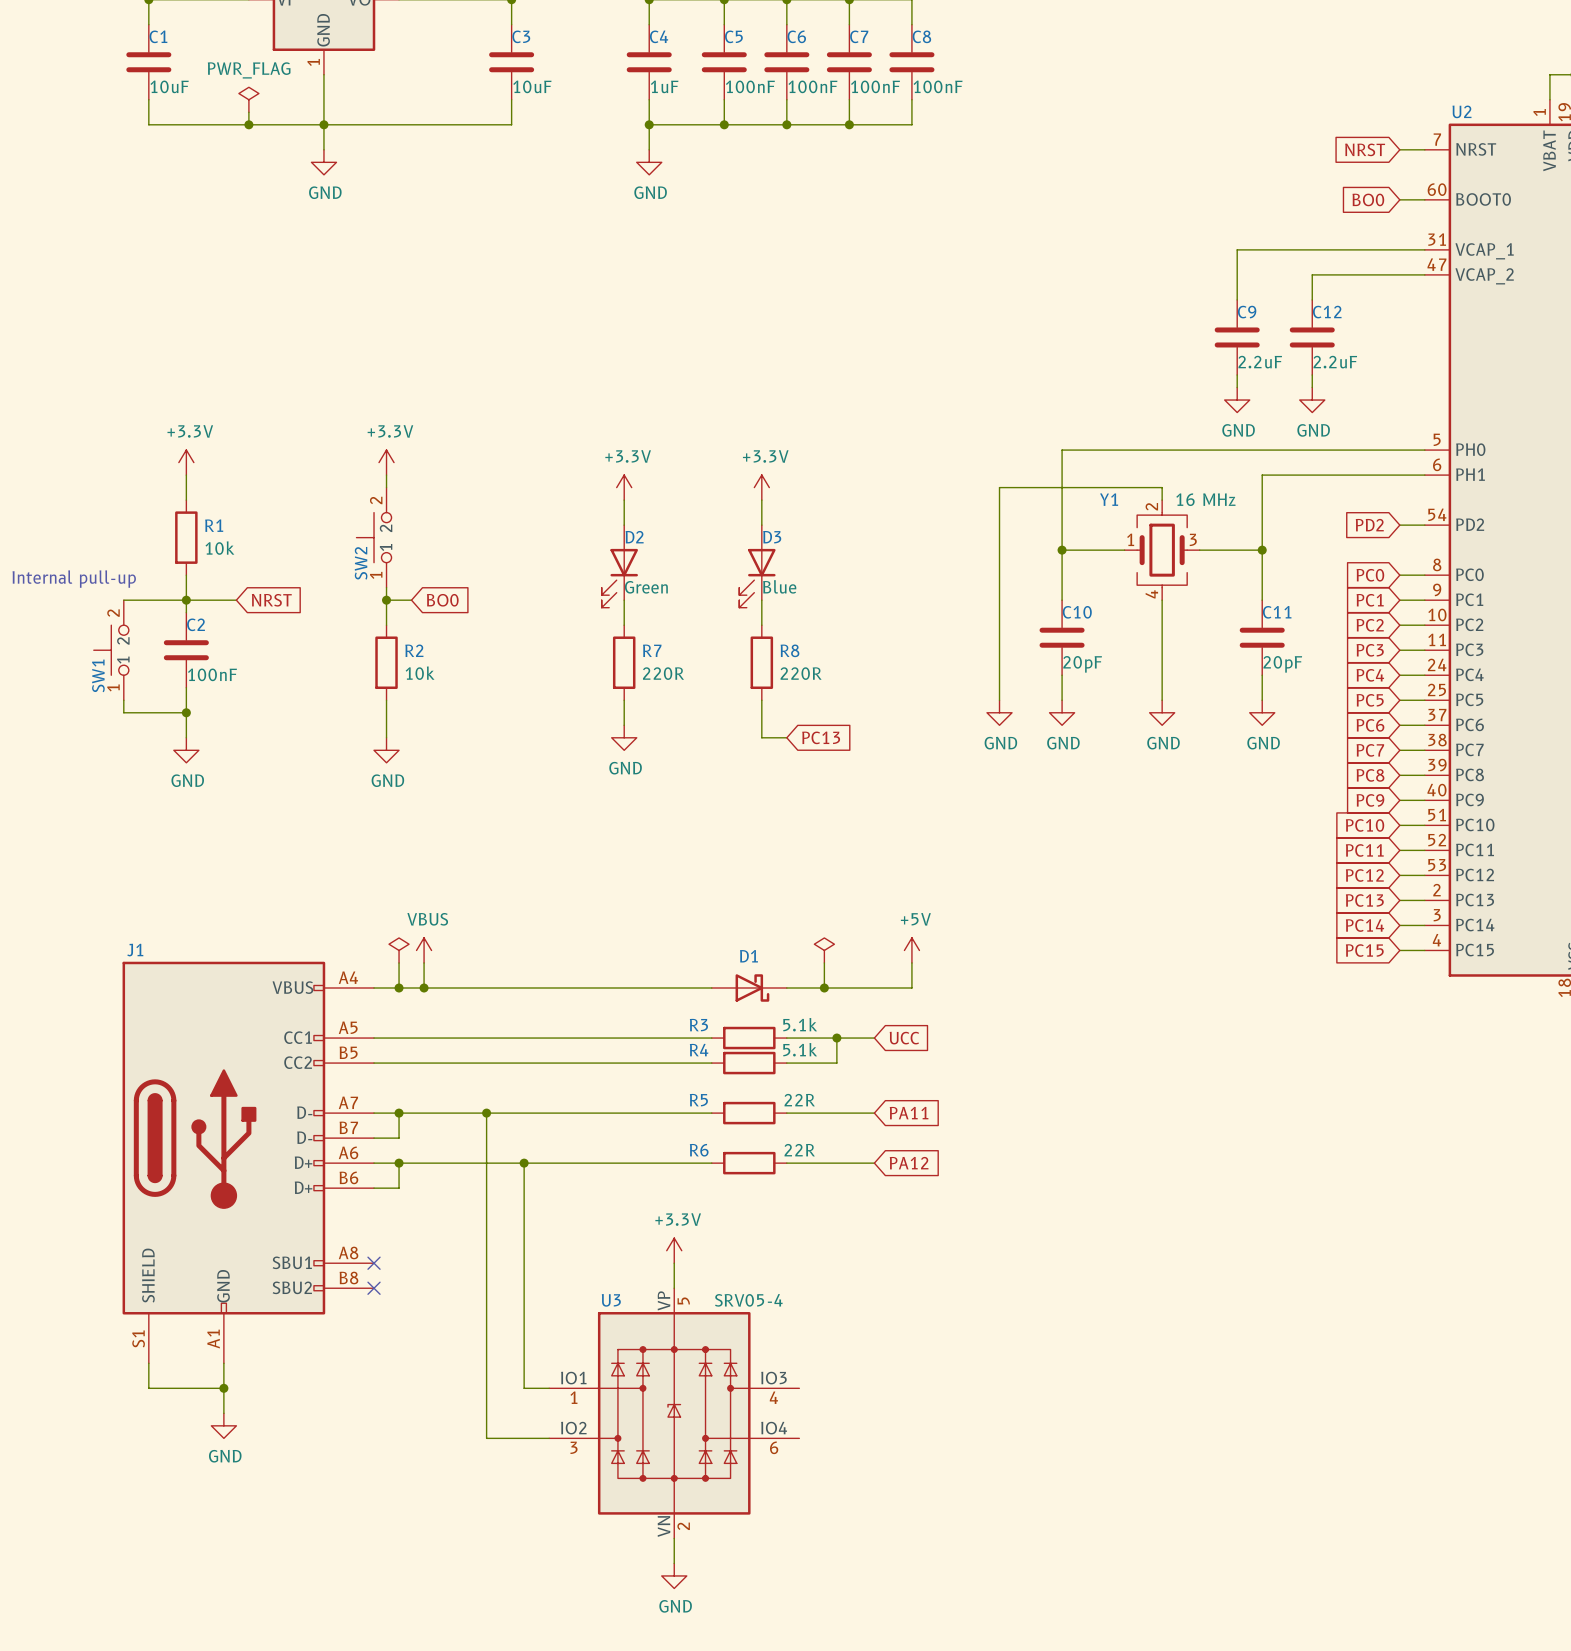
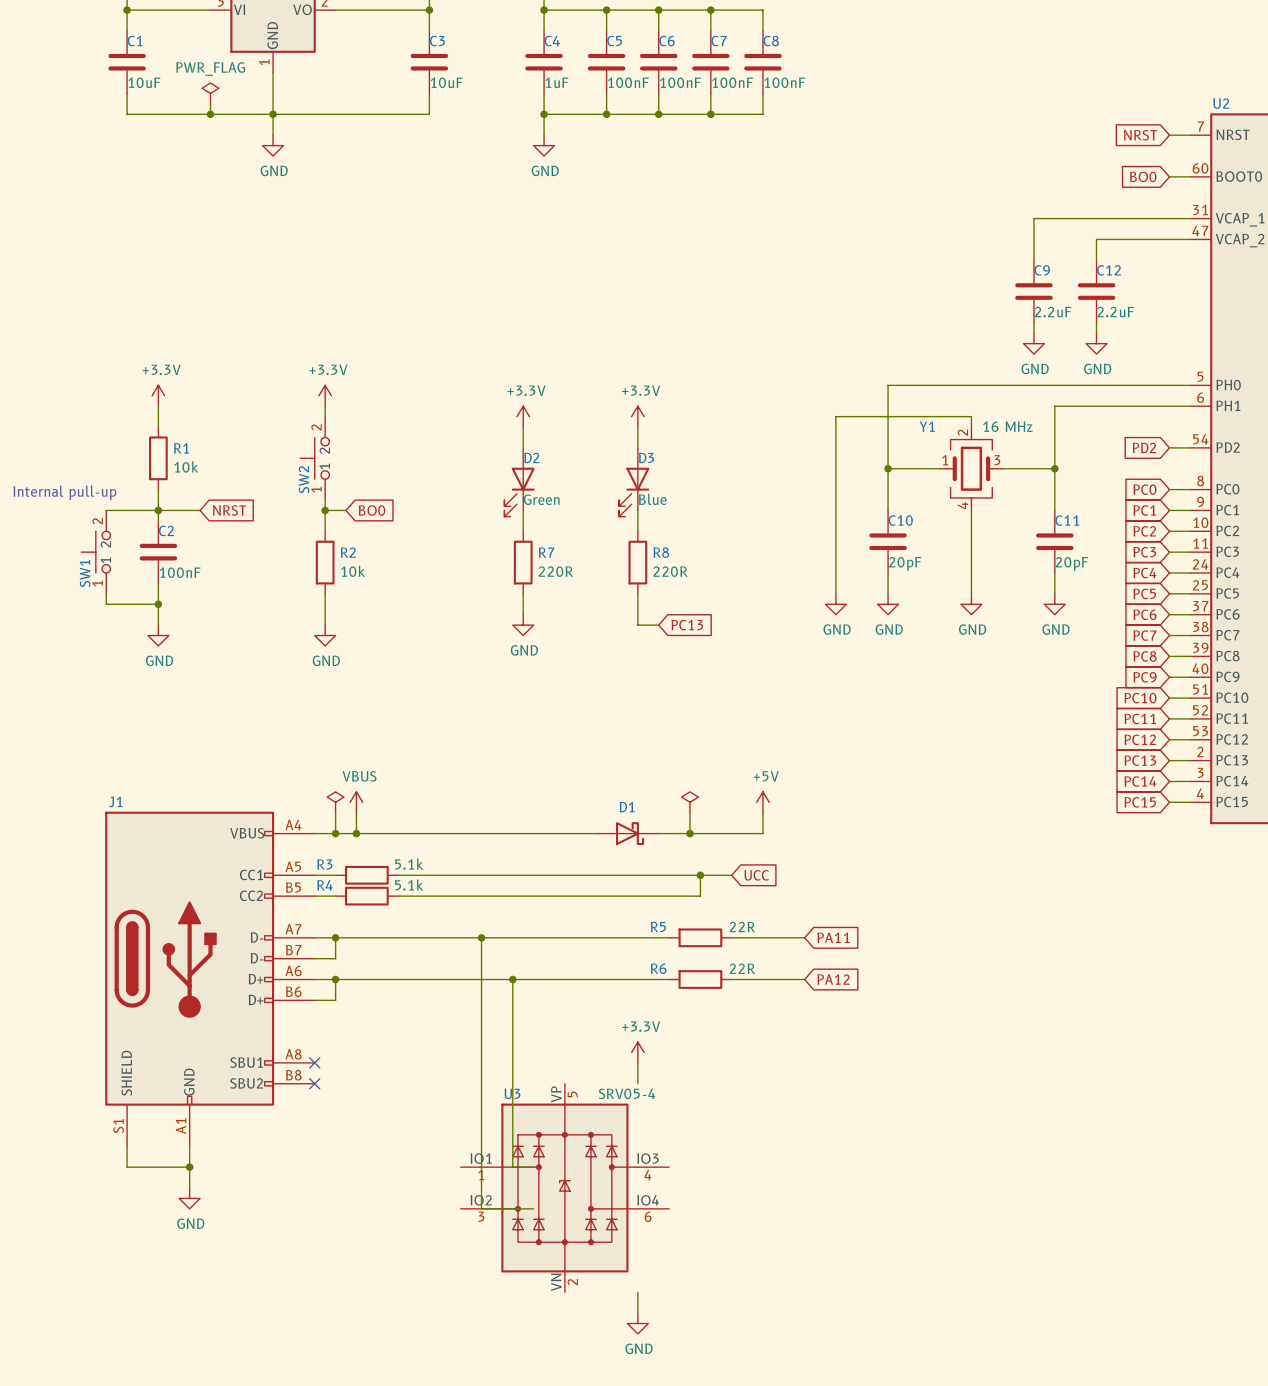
wire: (399, 1038) (474, 1038) -> none
wire: none -> (596, 875) (658, 875)
R3 position: (749, 1038) -> (366, 875)
wire: (399, 1063) (474, 1063) -> none
wire: none -> (596, 896) (658, 896)
R4 position: (749, 1063) -> (366, 896)
wire: (486, 1113) (486, 1438) (549, 1438) -> (481, 937) (481, 1208) (533, 1208)
junction: (486, 1113) -> none
junction: none -> (481, 937)
wire: none -> (596, 937) (658, 937)
R5 position: (749, 1113) -> (700, 937)
wire: (799, 1113) (874, 1113) -> (804, 937) (731, 937)
global label position: PA11 (909, 1113) -> PA11 (833, 937)
wire: (524, 1163) (524, 1388) (549, 1388) -> (512, 979) (512, 1167) (533, 1167)
junction: (524, 1163) -> none
junction: none -> (512, 979)
wire: none -> (596, 979) (658, 979)
R6 position: (749, 1163) -> (700, 979)
wire: (799, 1163) (874, 1163) -> (804, 979) (731, 979)
global label position: PA12 (909, 1163) -> PA12 (833, 979)
power symbol position: +3.3V (674, 1250) -> +3.3V (637, 1052)
wire: (674, 1263) (674, 1288) -> (637, 1062) (637, 1083)
wire: (674, 1538) (674, 1563) -> (637, 1292) (637, 1313)
power symbol position: GND (674, 1575) -> GND (637, 1323)

